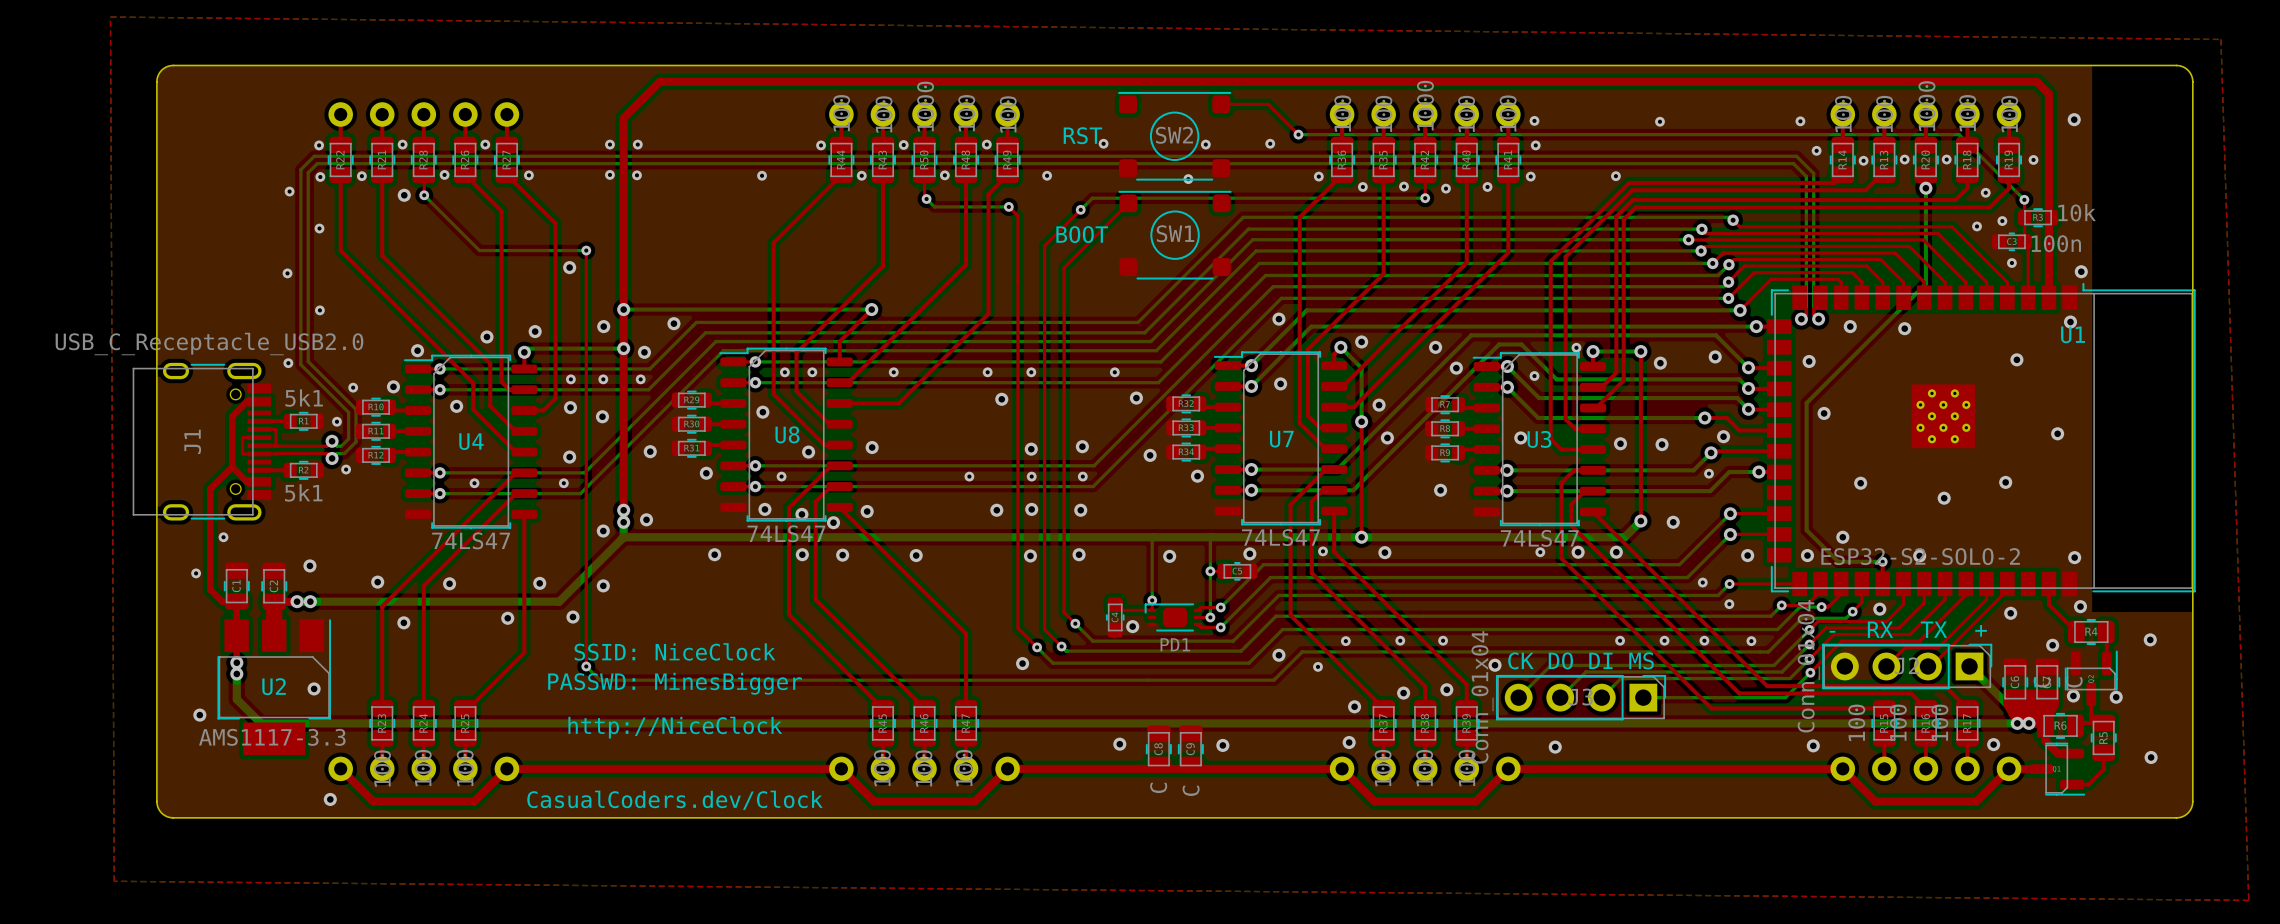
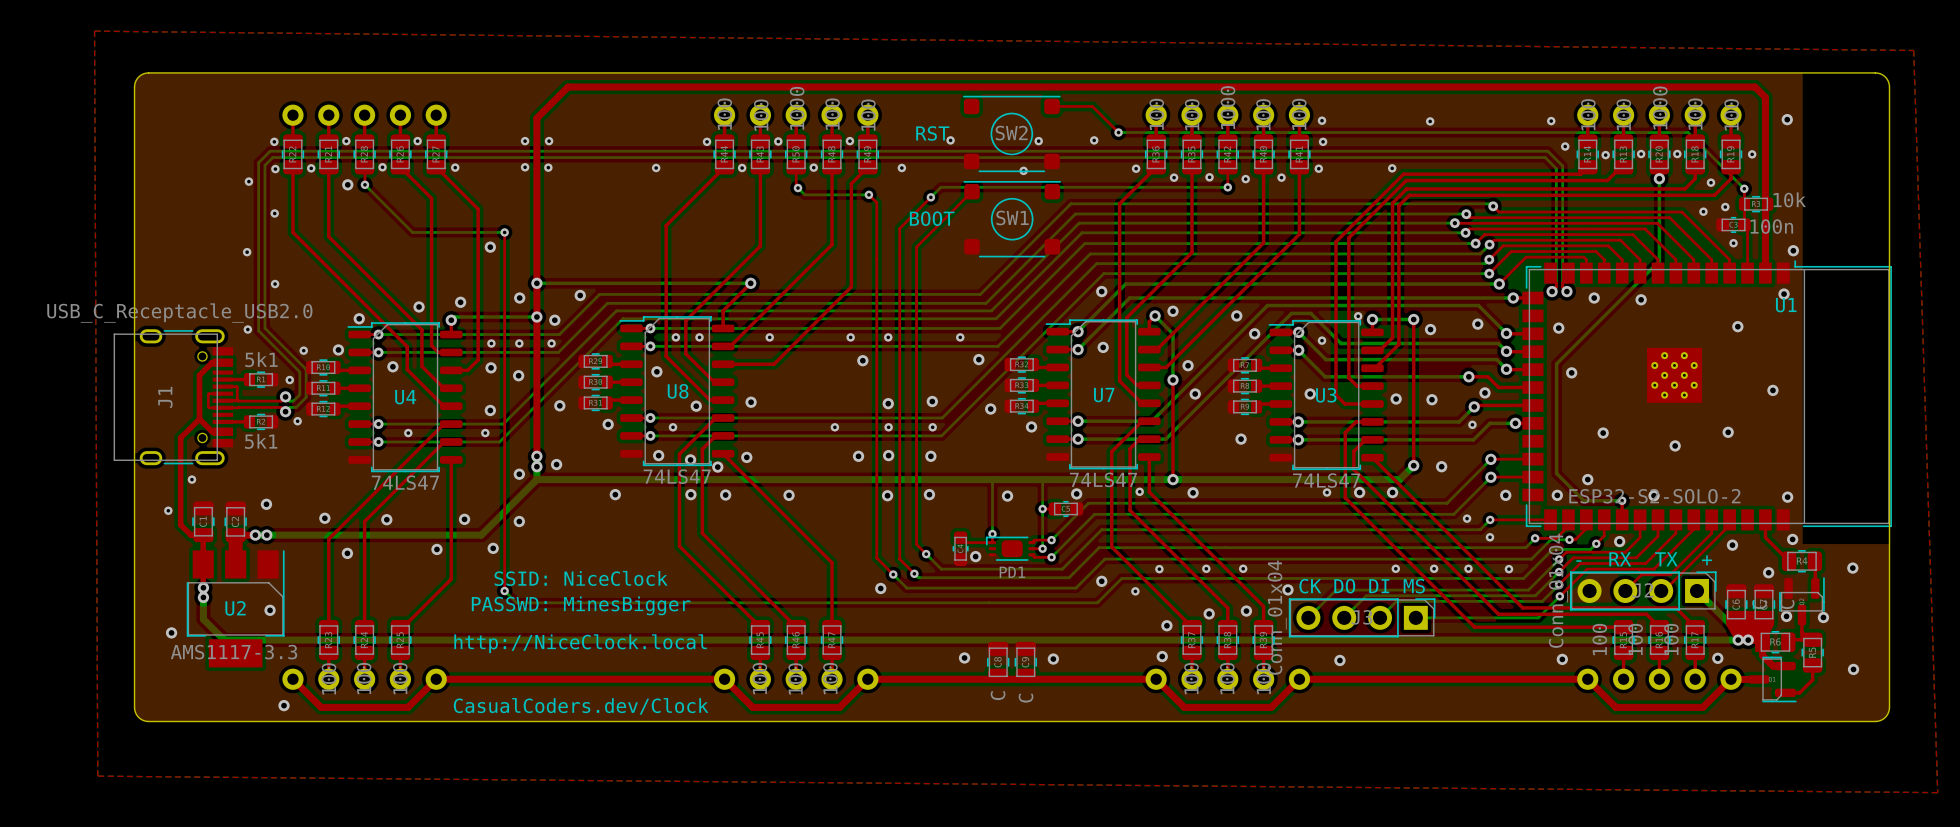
text: http://NiceClock (675, 727) -> http://NiceClock.local (580, 643)

